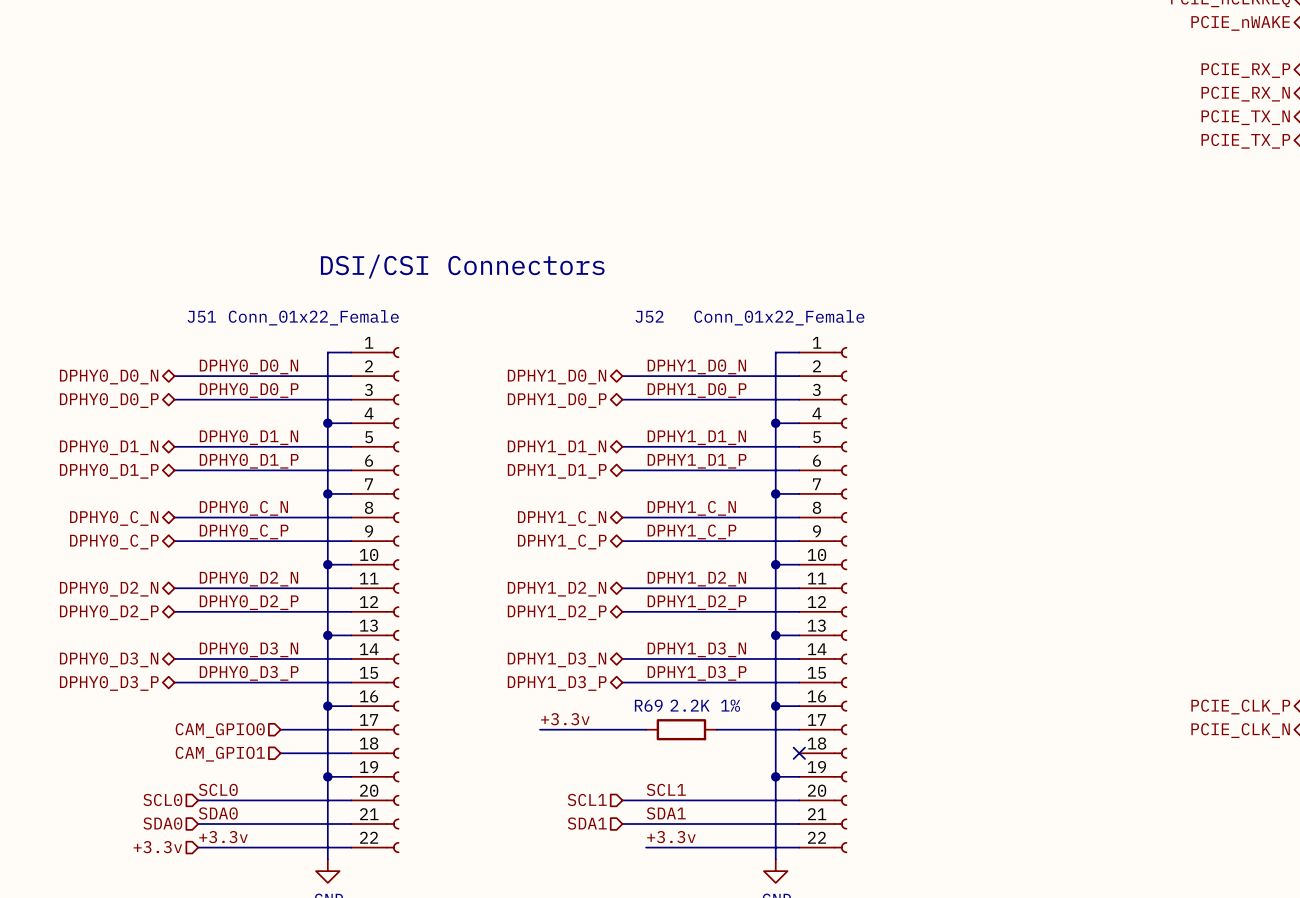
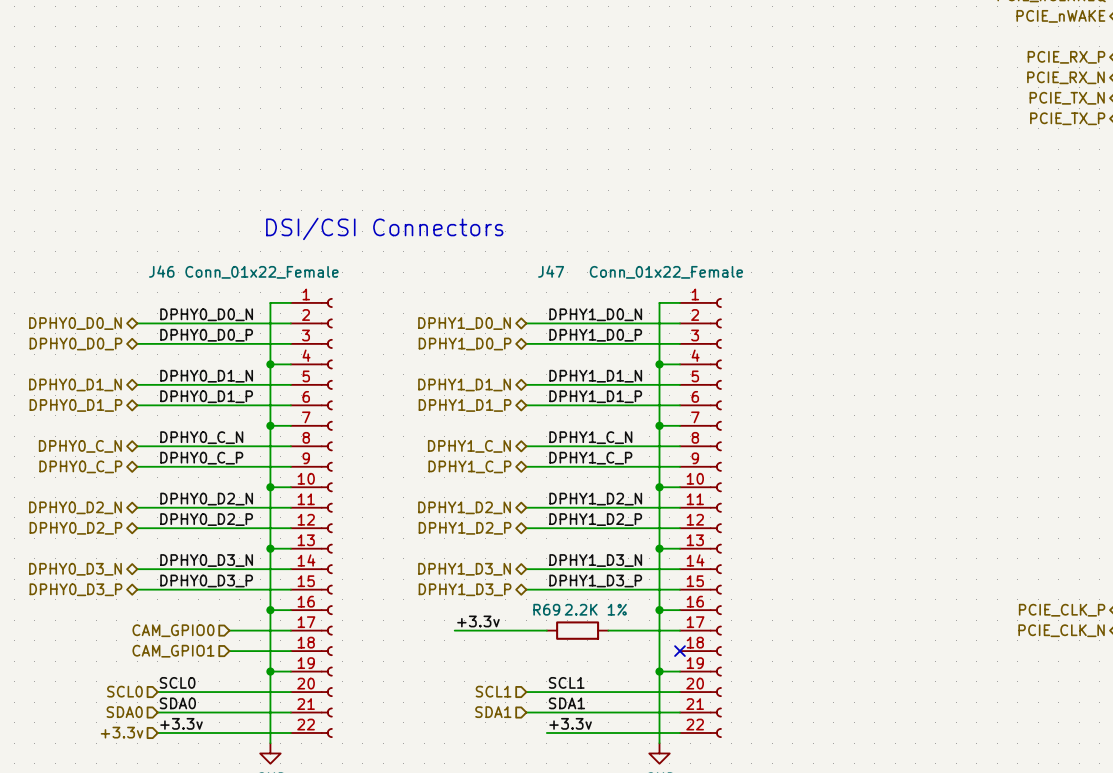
J51 name: J51 (201, 316) -> J46 (161, 271)
J52 name: J52 (649, 316) -> J47 (551, 271)

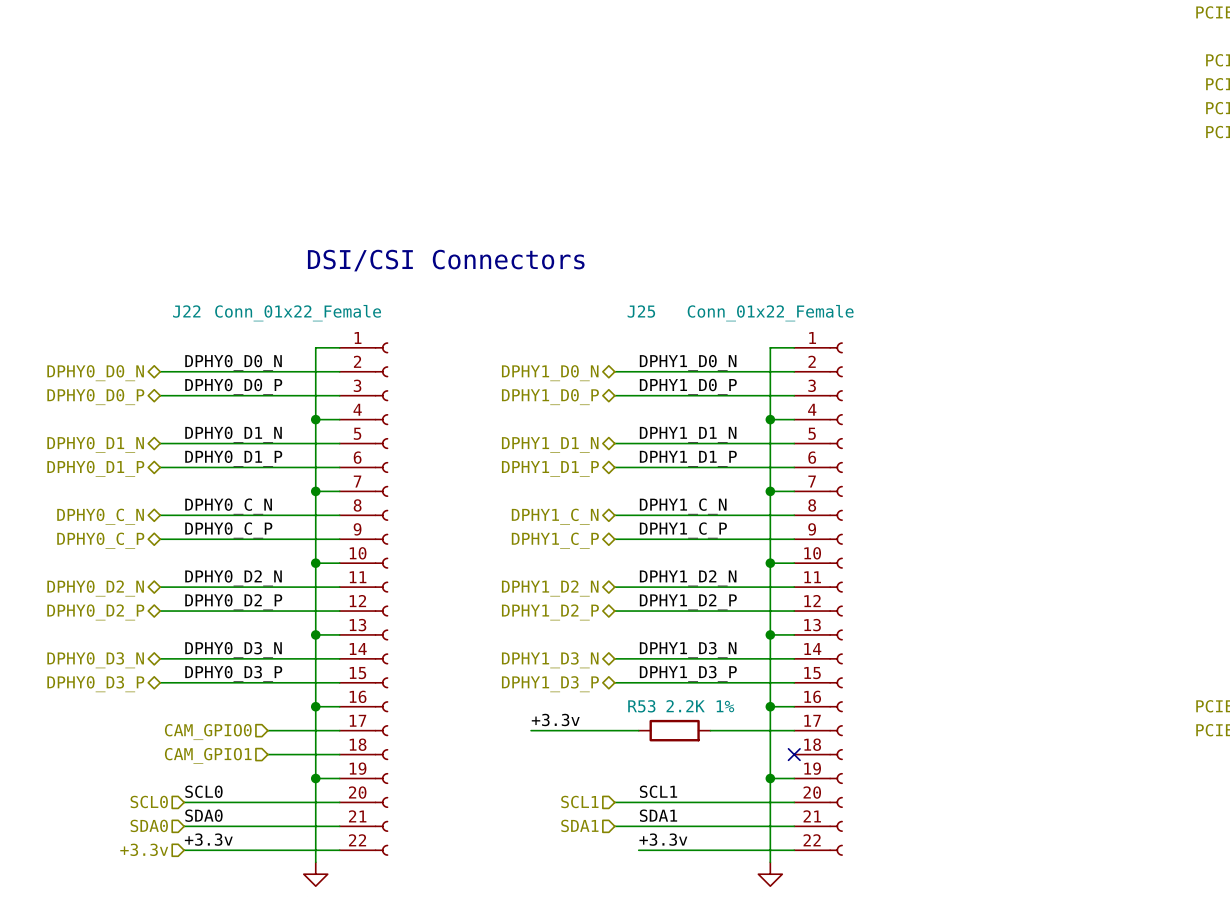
J46 name: J46 (161, 271) -> J22 (186, 311)
J47 name: J47 (551, 271) -> J25 (641, 311)
R69 name: R69 (546, 609) -> R53 (641, 706)

